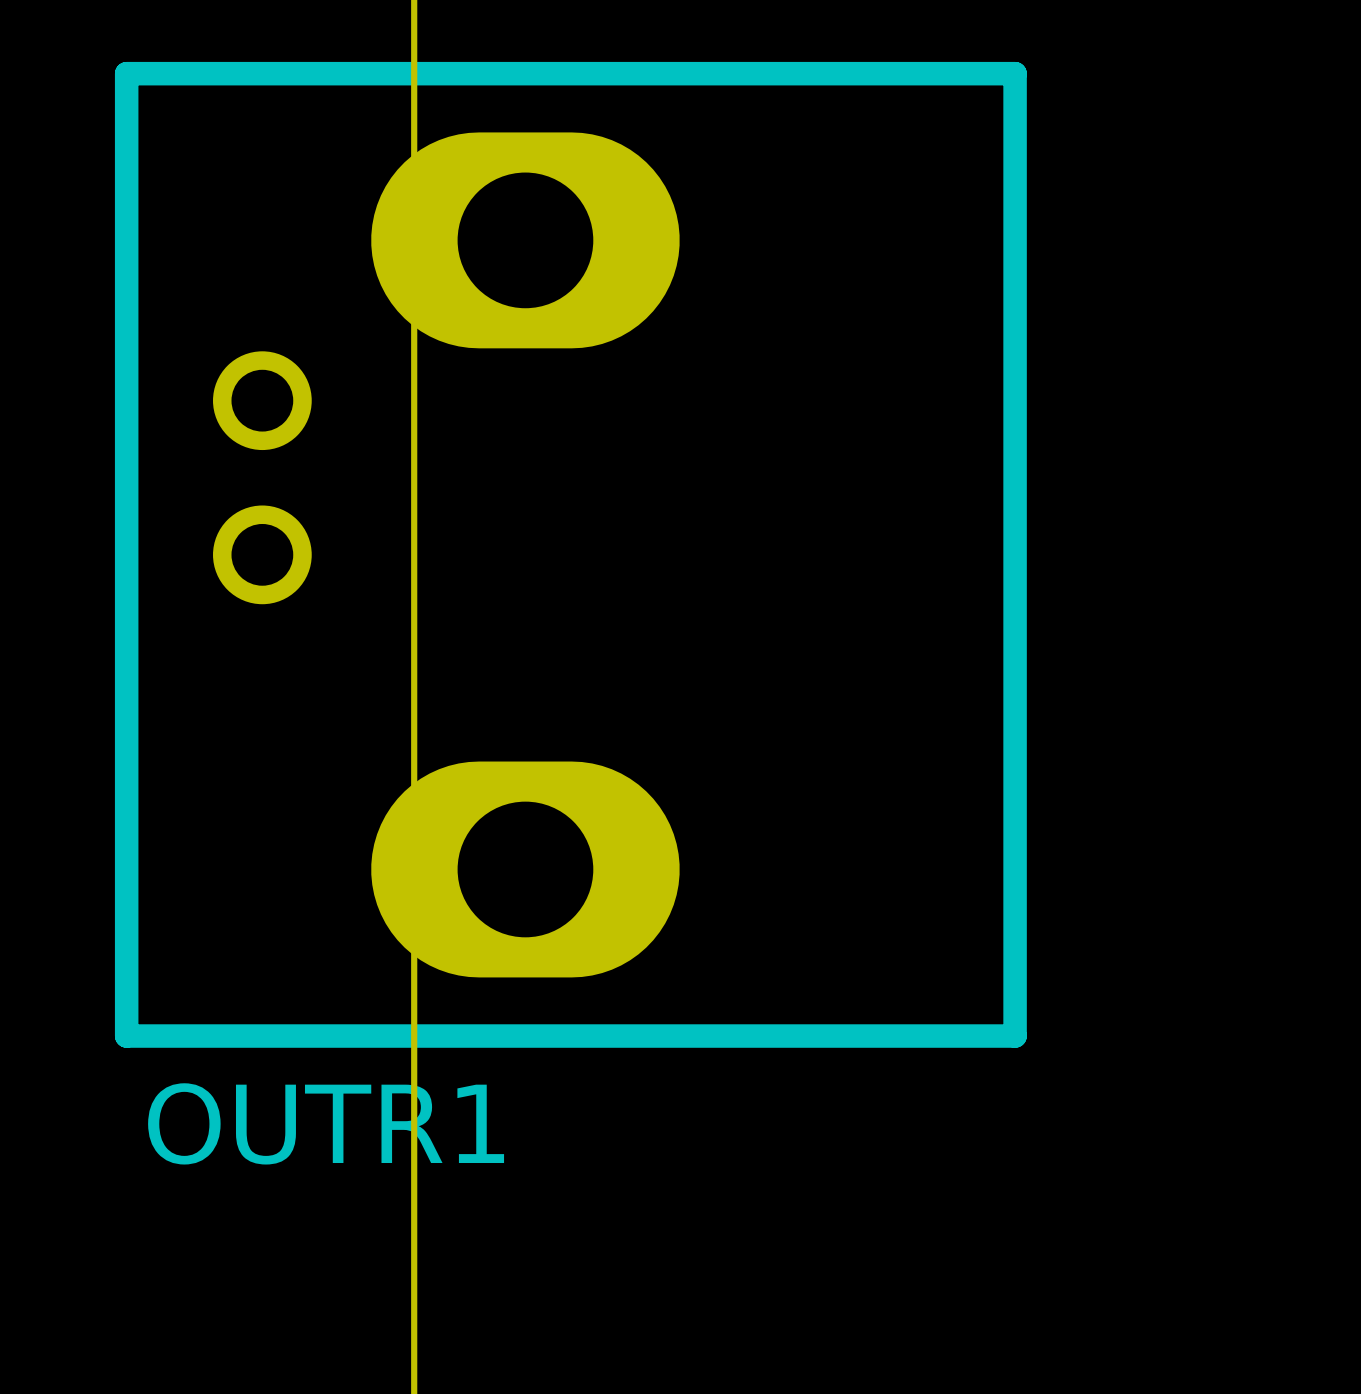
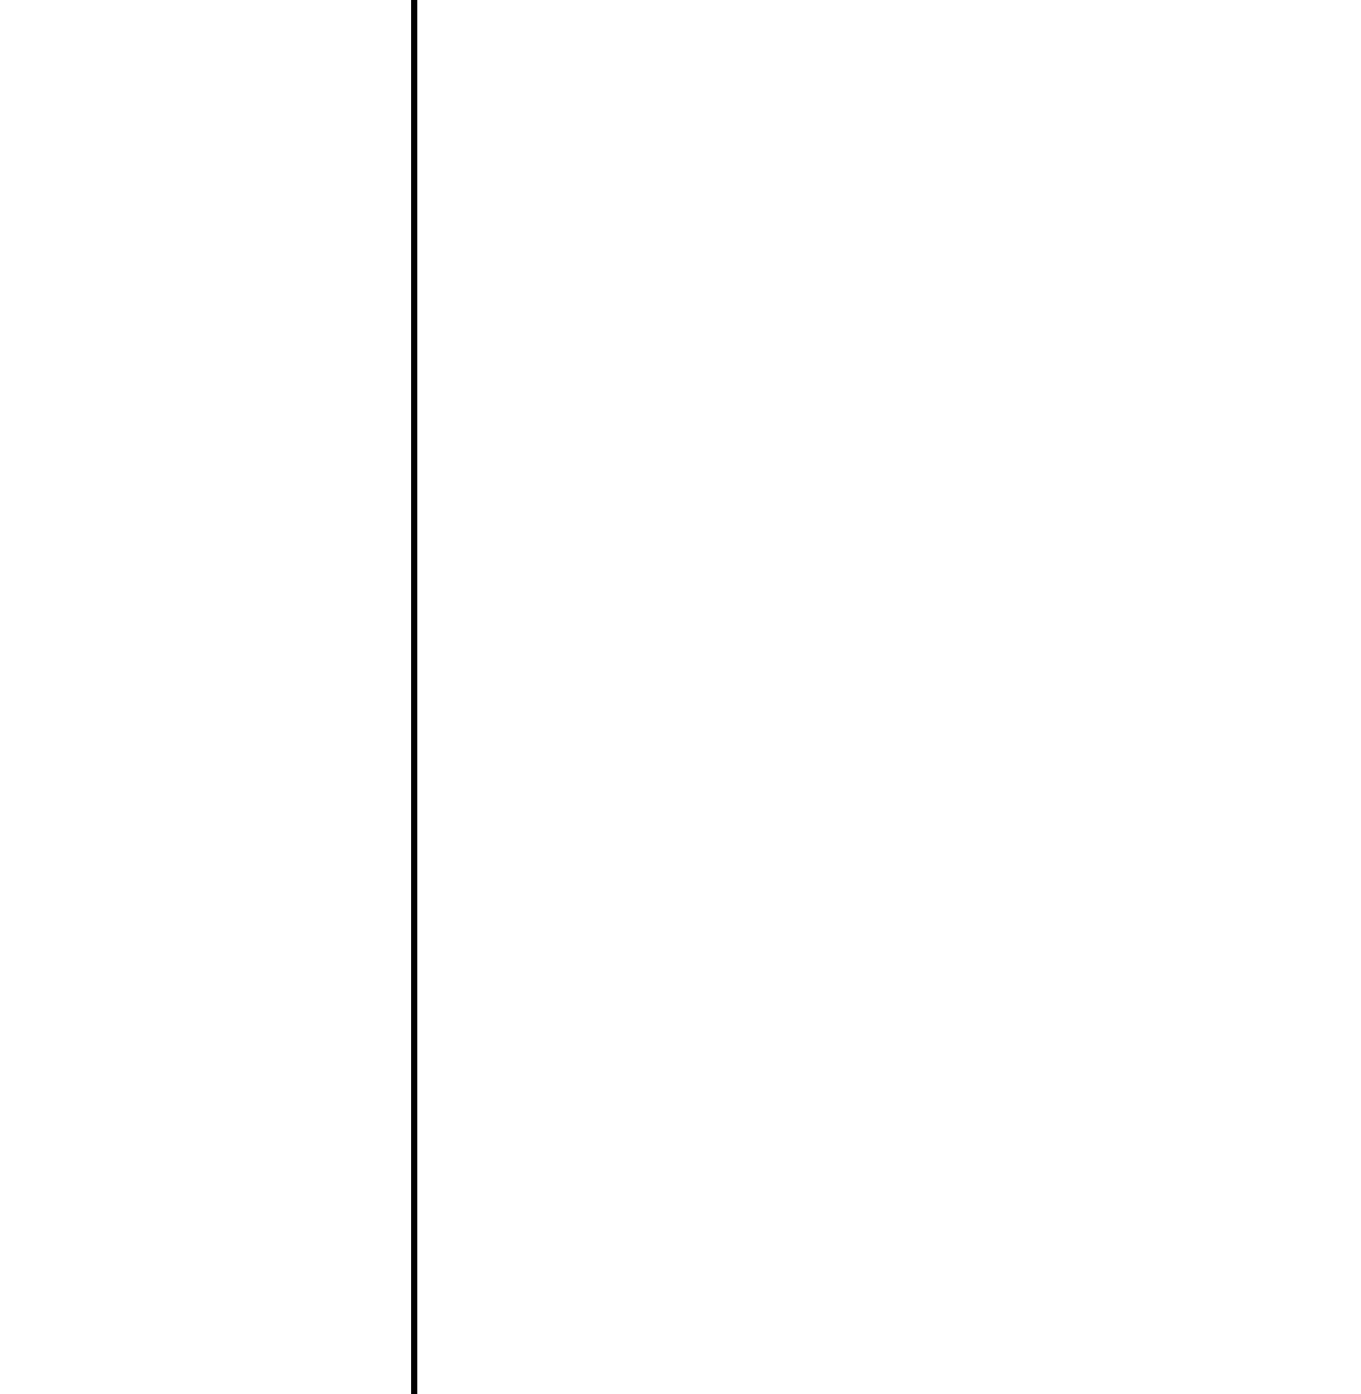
OUTR1: (570, 554) -> none

